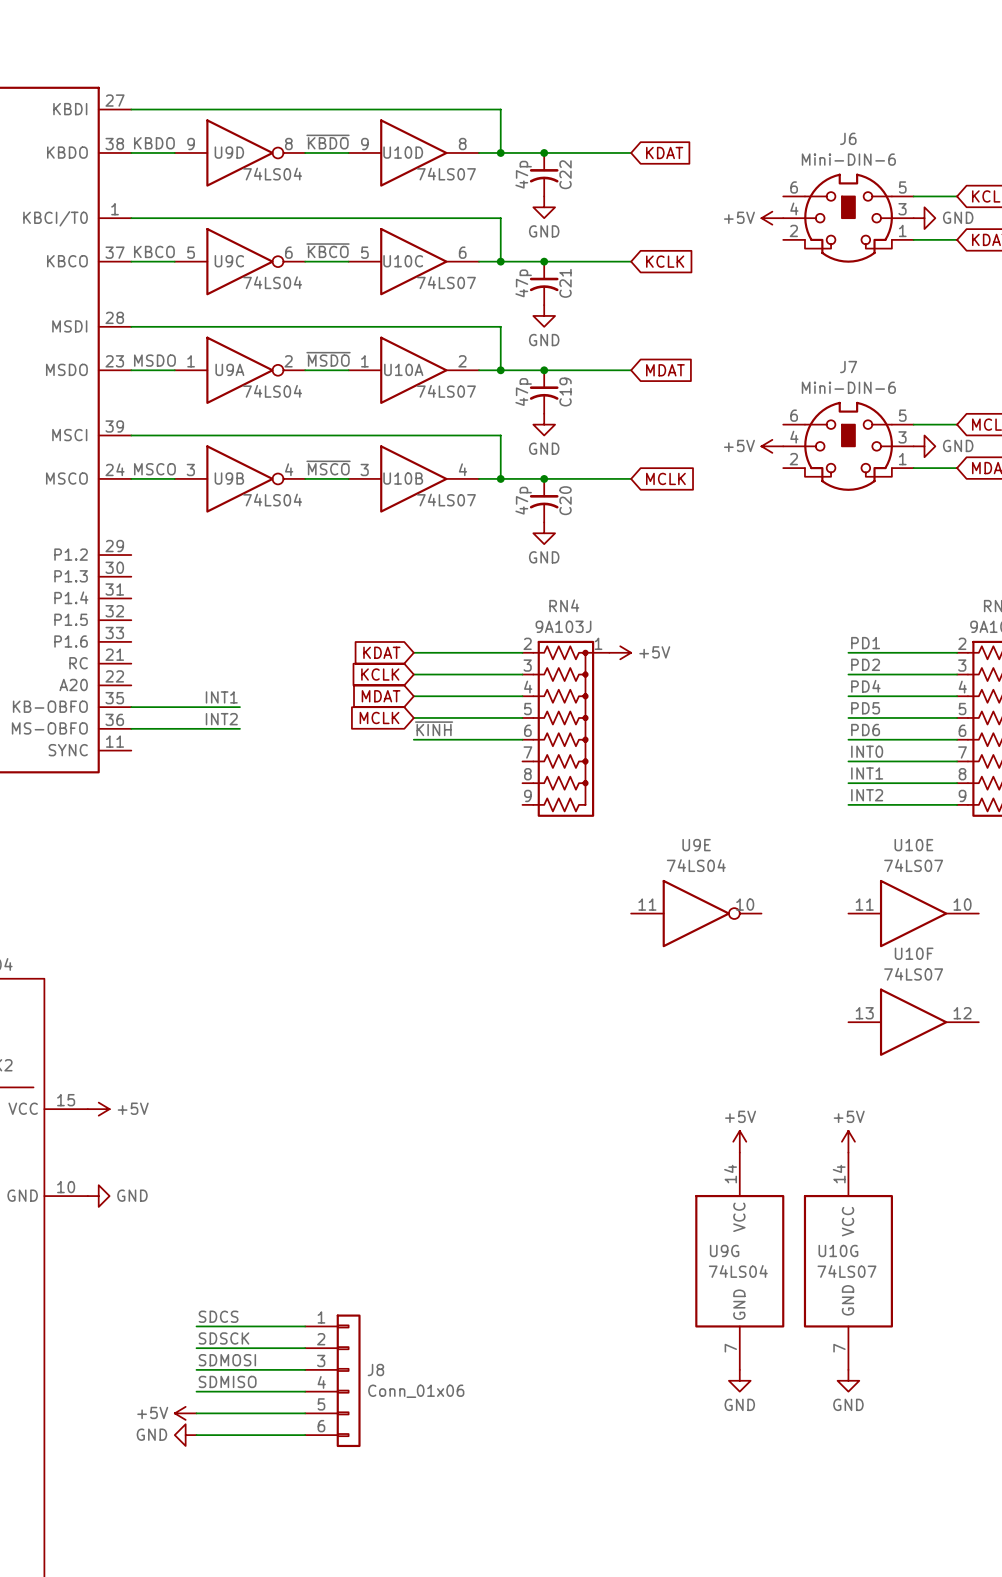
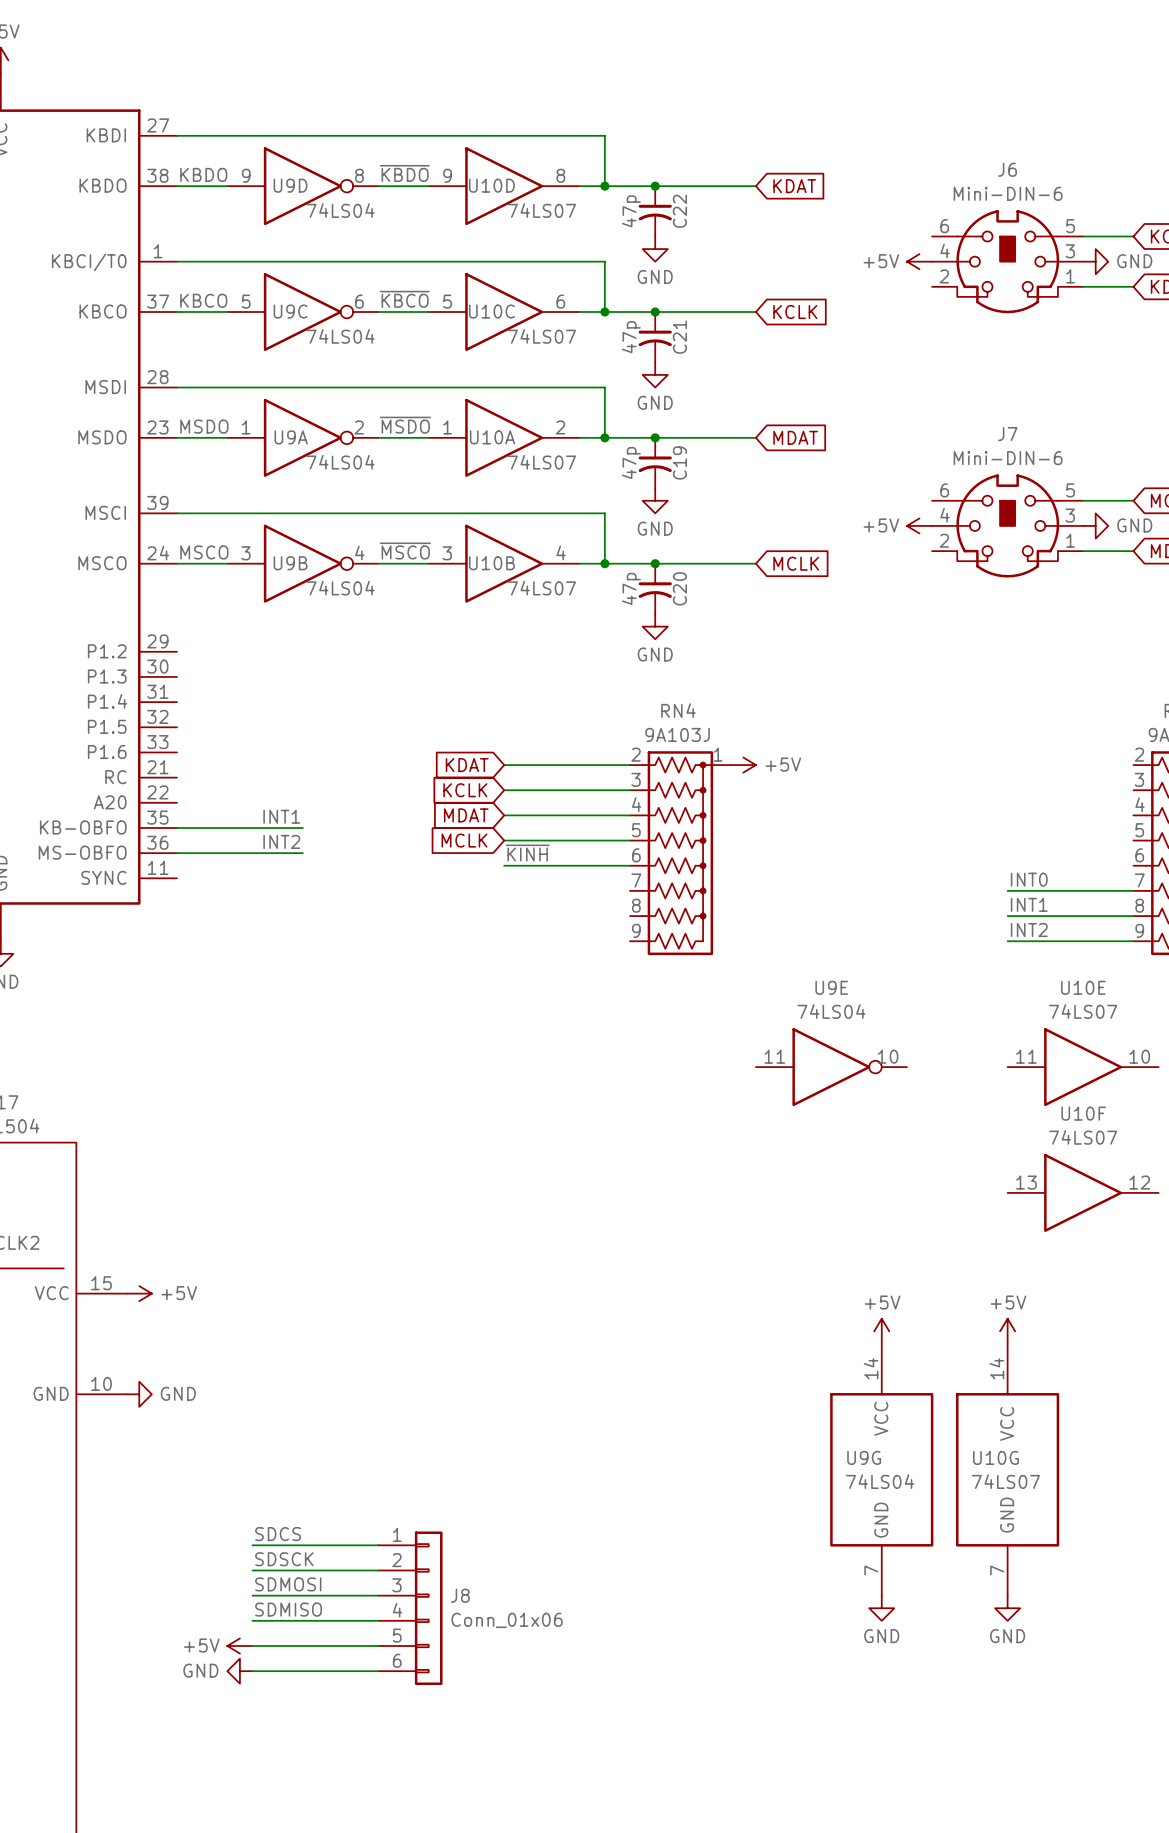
label: PD1 (865, 643) -> none
wire: (848, 652) (957, 652) -> none
label: PD2 (865, 664) -> none
wire: (848, 674) (957, 674) -> none
label: PD4 (865, 686) -> none
wire: (848, 696) (957, 696) -> none
label: PD5 (865, 708) -> none
wire: (848, 717) (957, 717) -> none
label: PD6 (865, 730) -> none
wire: (848, 739) (957, 739) -> none

